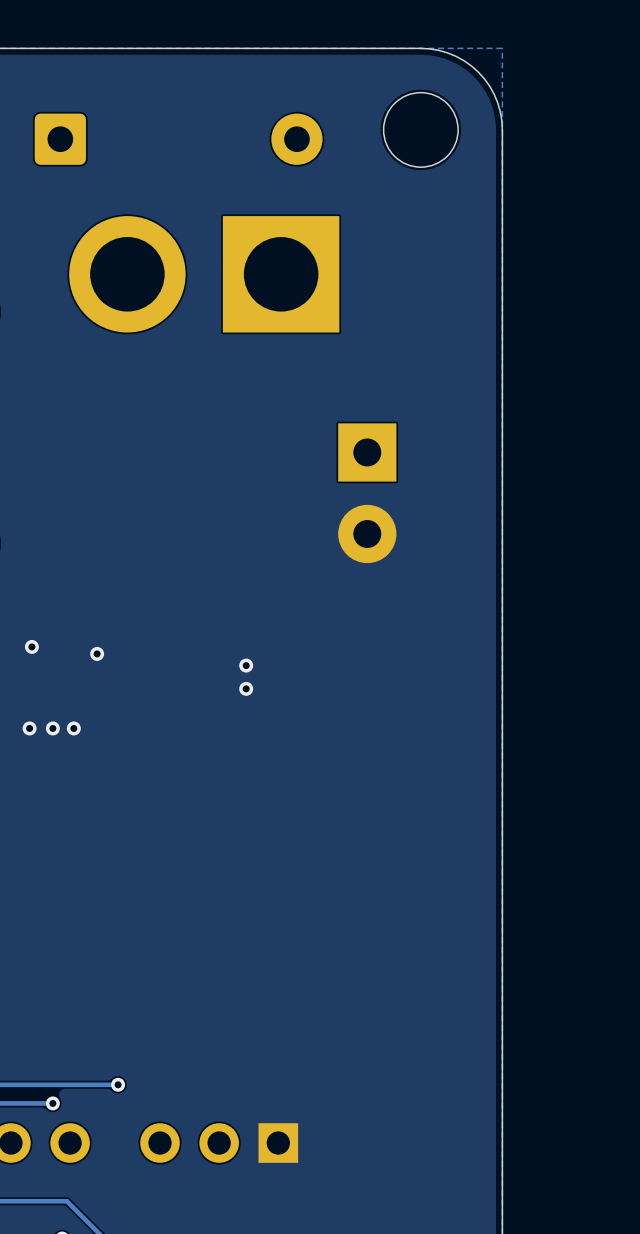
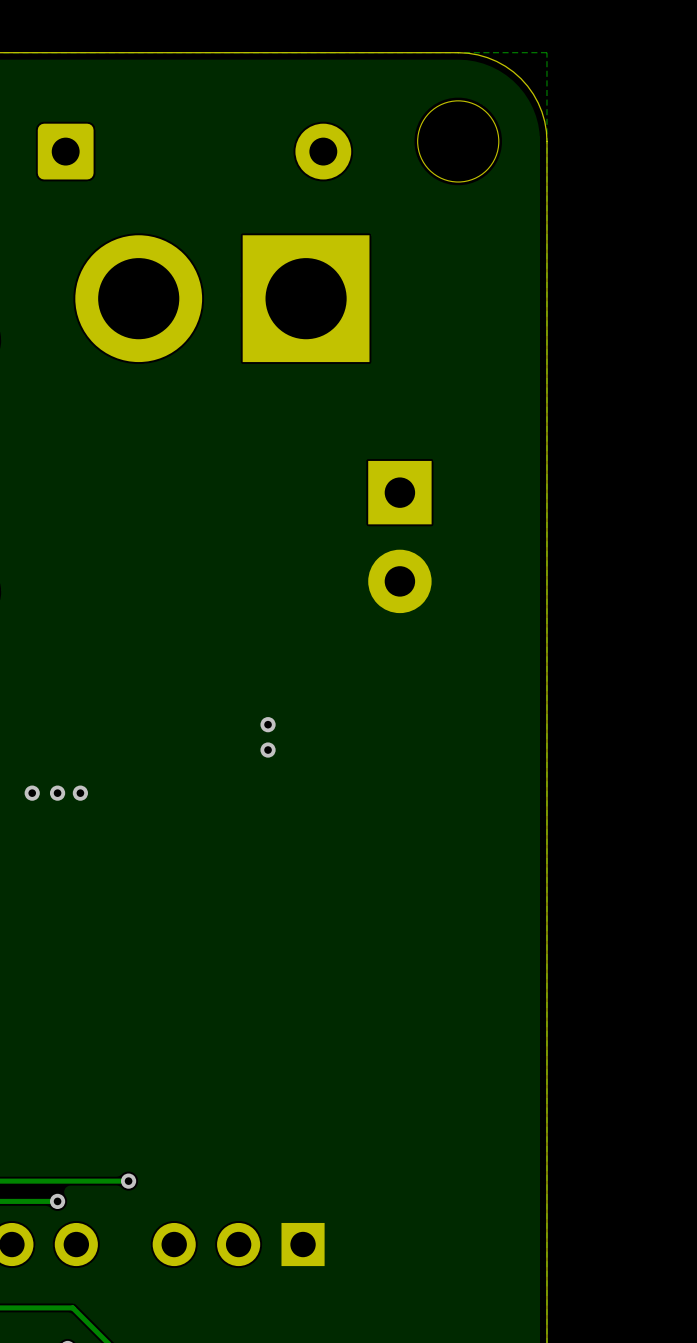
via: (31, 646) -> none
via: (97, 653) -> none

